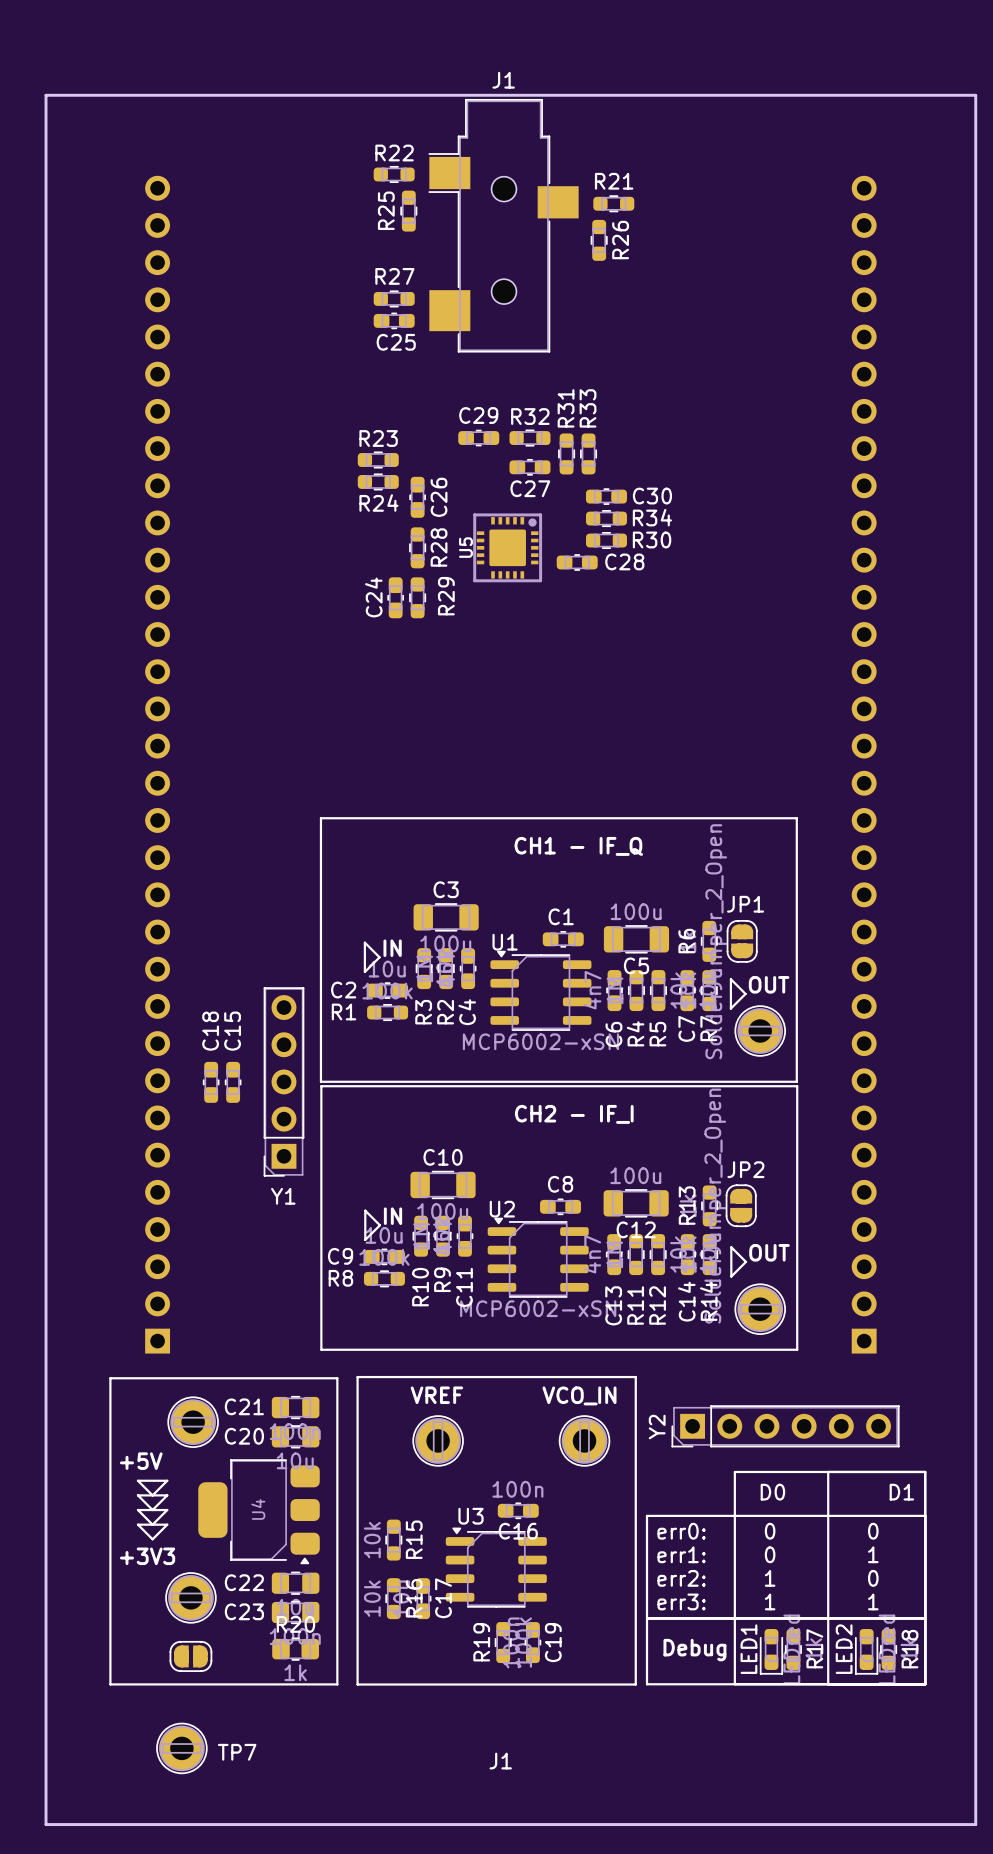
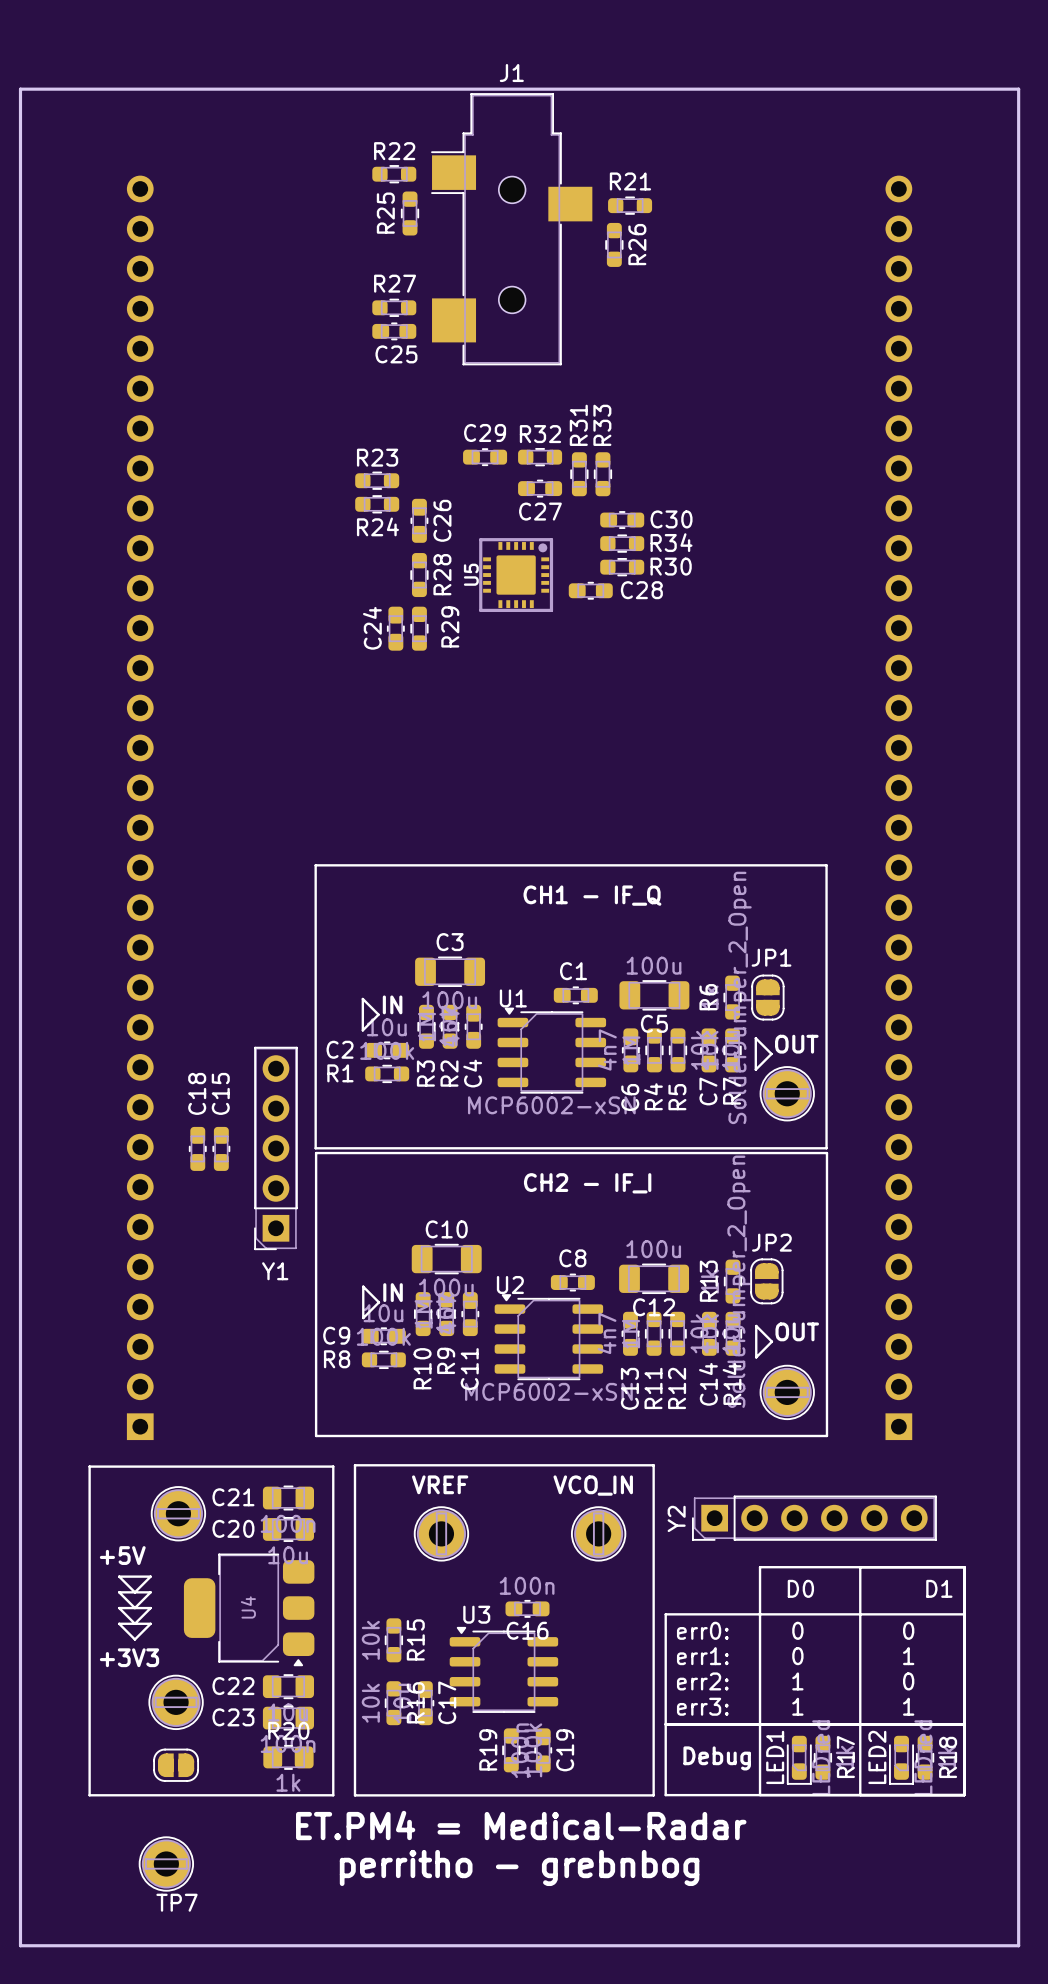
text: none -> ET.PM4 = Medical-Radar (521, 1825)
TP7 name position: TP7 (237, 1752) -> TP7 (176, 1902)
text: none -> perritho - grebnbog (519, 1867)
text: J1 (500, 1761) -> none

